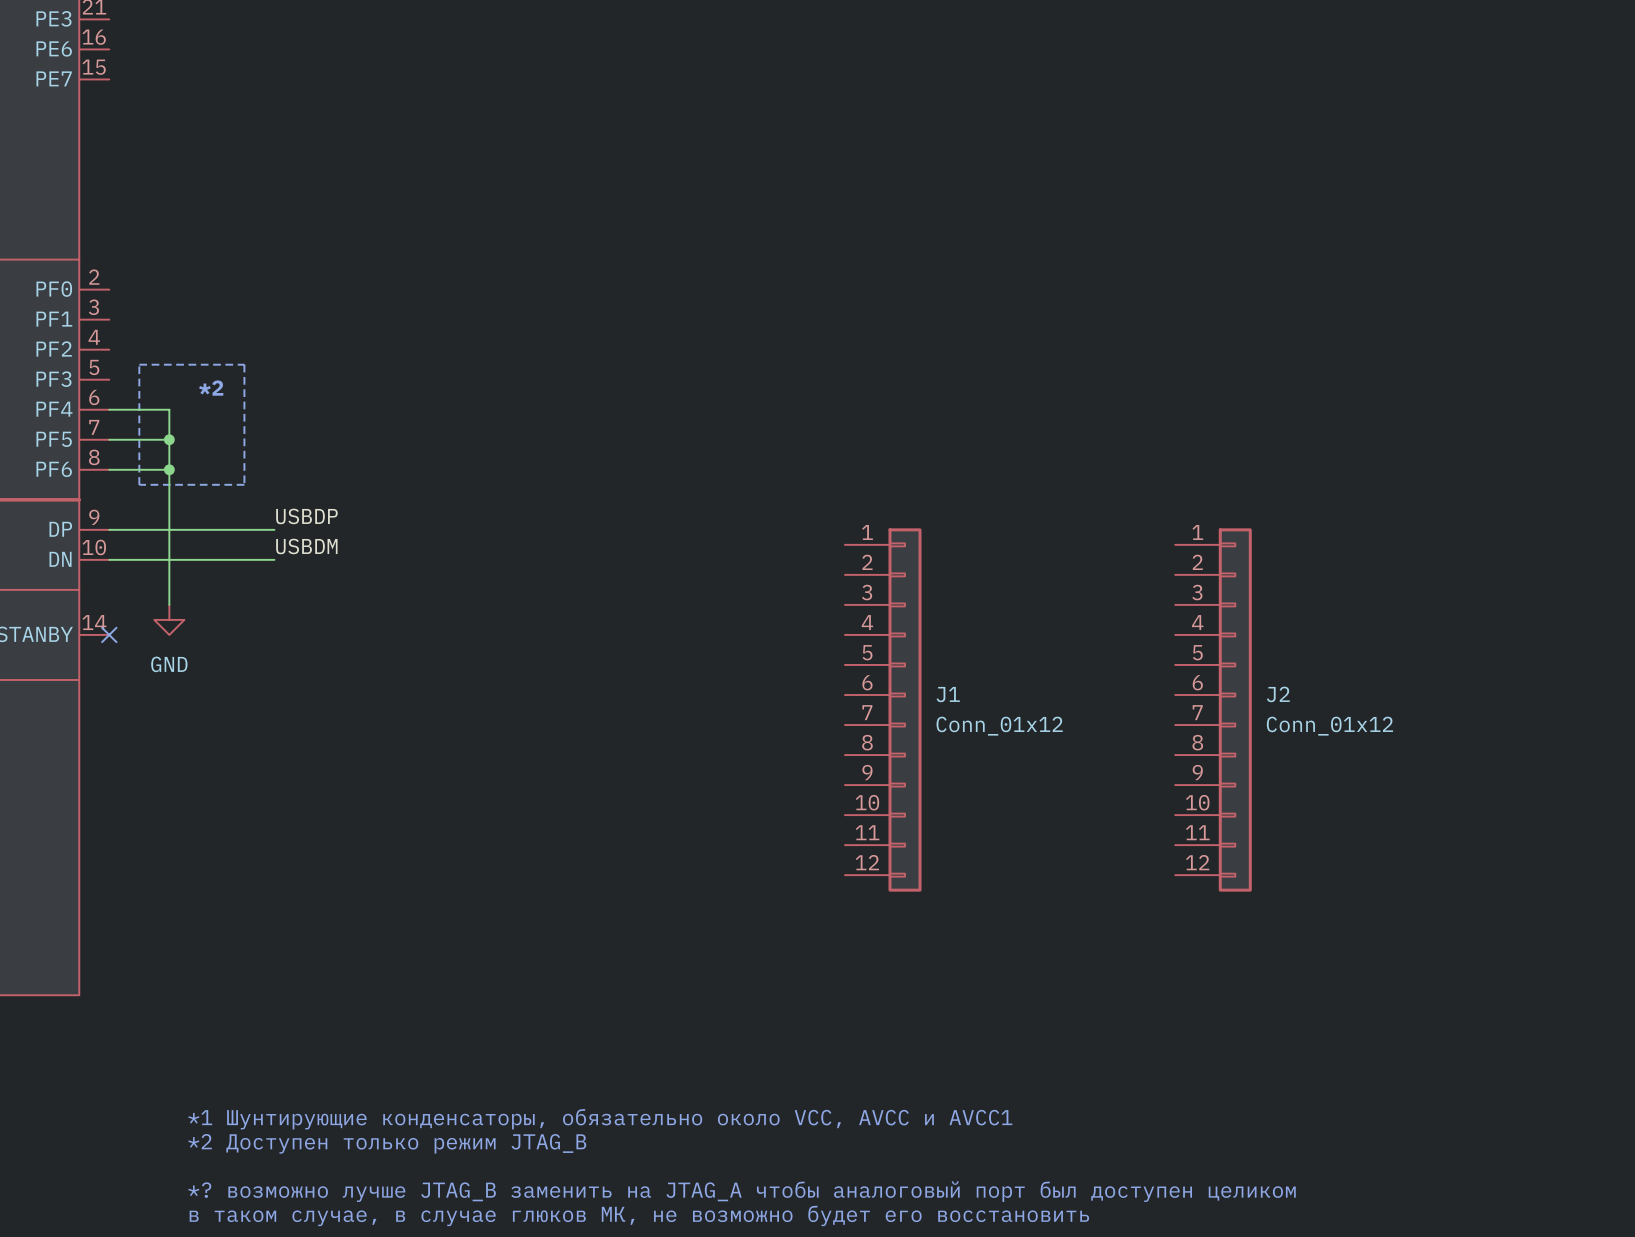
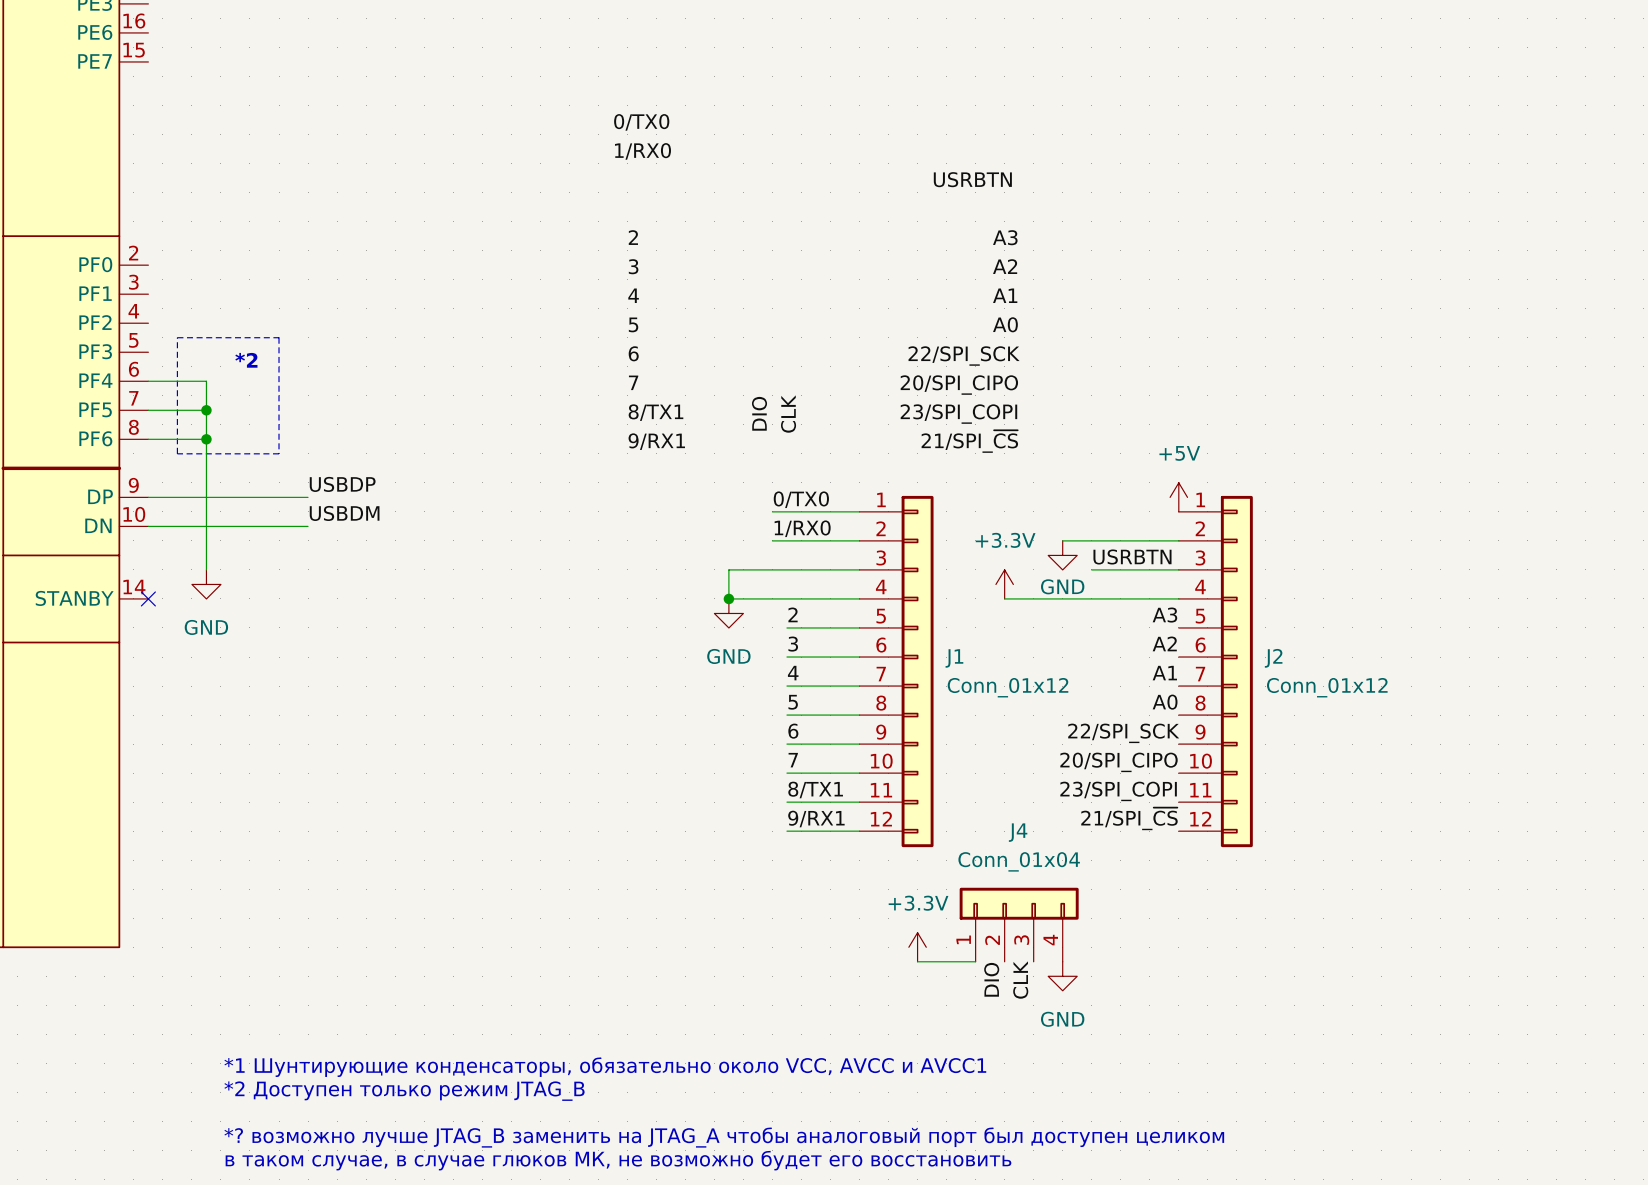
label: none -> 0/TX0 (641, 122)
label: none -> 1/RX0 (642, 151)
label: none -> USRBTN (972, 179)
label: none -> 2 (633, 237)
label: none -> A3 (1005, 237)
label: none -> 3 (633, 266)
label: none -> A2 (1005, 266)
label: none -> 4 (633, 295)
label: none -> A1 (1005, 295)
label: none -> 5 (633, 324)
label: none -> A0 (1005, 324)
label: none -> 6 (633, 353)
label: none -> 22/SPI_SCK (964, 356)
label: none -> 7 (633, 382)
label: none -> 20/SPI_CIPO (959, 385)
label: none -> 8/TX1 (655, 412)
label: none -> 23/SPI_COPI (958, 414)
label: none -> DIO (759, 413)
label: none -> CLK (788, 414)
label: none -> 21/SPI_~{CS} (969, 441)
label: none -> 9/RX1 (656, 441)
power symbol: none -> +5V (1178, 497)
label: none -> 0/TX0 (801, 499)
wire: none -> (772, 511) (859, 511)
label: none -> 1/RX0 (802, 528)
wire: none -> (772, 540) (859, 540)
wire: none -> (1062, 540) (1178, 540)
power symbol: none -> GND (1062, 555)
label: none -> USRBTN (1132, 556)
wire: none -> (859, 569) (728, 569) (728, 598) (859, 598)
wire: none -> (1091, 569) (1178, 569)
power symbol: none -> +3.3V (1004, 584)
junction: none -> (728, 598)
wire: none -> (1004, 598) (1178, 598)
power symbol: none -> GND (728, 613)
label: none -> 2 (793, 614)
label: none -> A3 (1164, 615)
wire: none -> (786, 627) (859, 627)
label: none -> 3 (793, 644)
label: none -> A2 (1164, 643)
wire: none -> (786, 657) (859, 657)
label: none -> 4 (793, 673)
label: none -> A1 (1164, 673)
wire: none -> (786, 686) (859, 686)
label: none -> 5 (793, 702)
label: none -> A0 (1165, 702)
wire: none -> (786, 715) (859, 715)
label: none -> 6 (793, 731)
label: none -> 22/SPI_SCK (1123, 733)
wire: none -> (786, 744) (859, 744)
label: none -> 7 (793, 760)
label: none -> 20/SPI_CIPO (1119, 762)
wire: none -> (786, 773) (859, 773)
label: none -> 8/TX1 (815, 789)
label: none -> 23/SPI_COPI (1118, 791)
wire: none -> (786, 802) (859, 802)
label: none -> 21/SPI_~{CS} (1129, 818)
label: none -> 9/RX1 (816, 819)
wire: none -> (786, 831) (859, 831)
J4: none -> Conn_01x04 (1019, 924)
power symbol: none -> +3.3V (917, 947)
wire: none -> (917, 961) (975, 961)
power symbol: none -> GND (1062, 976)
label: none -> DIO (991, 979)
label: none -> CLK (1020, 980)

